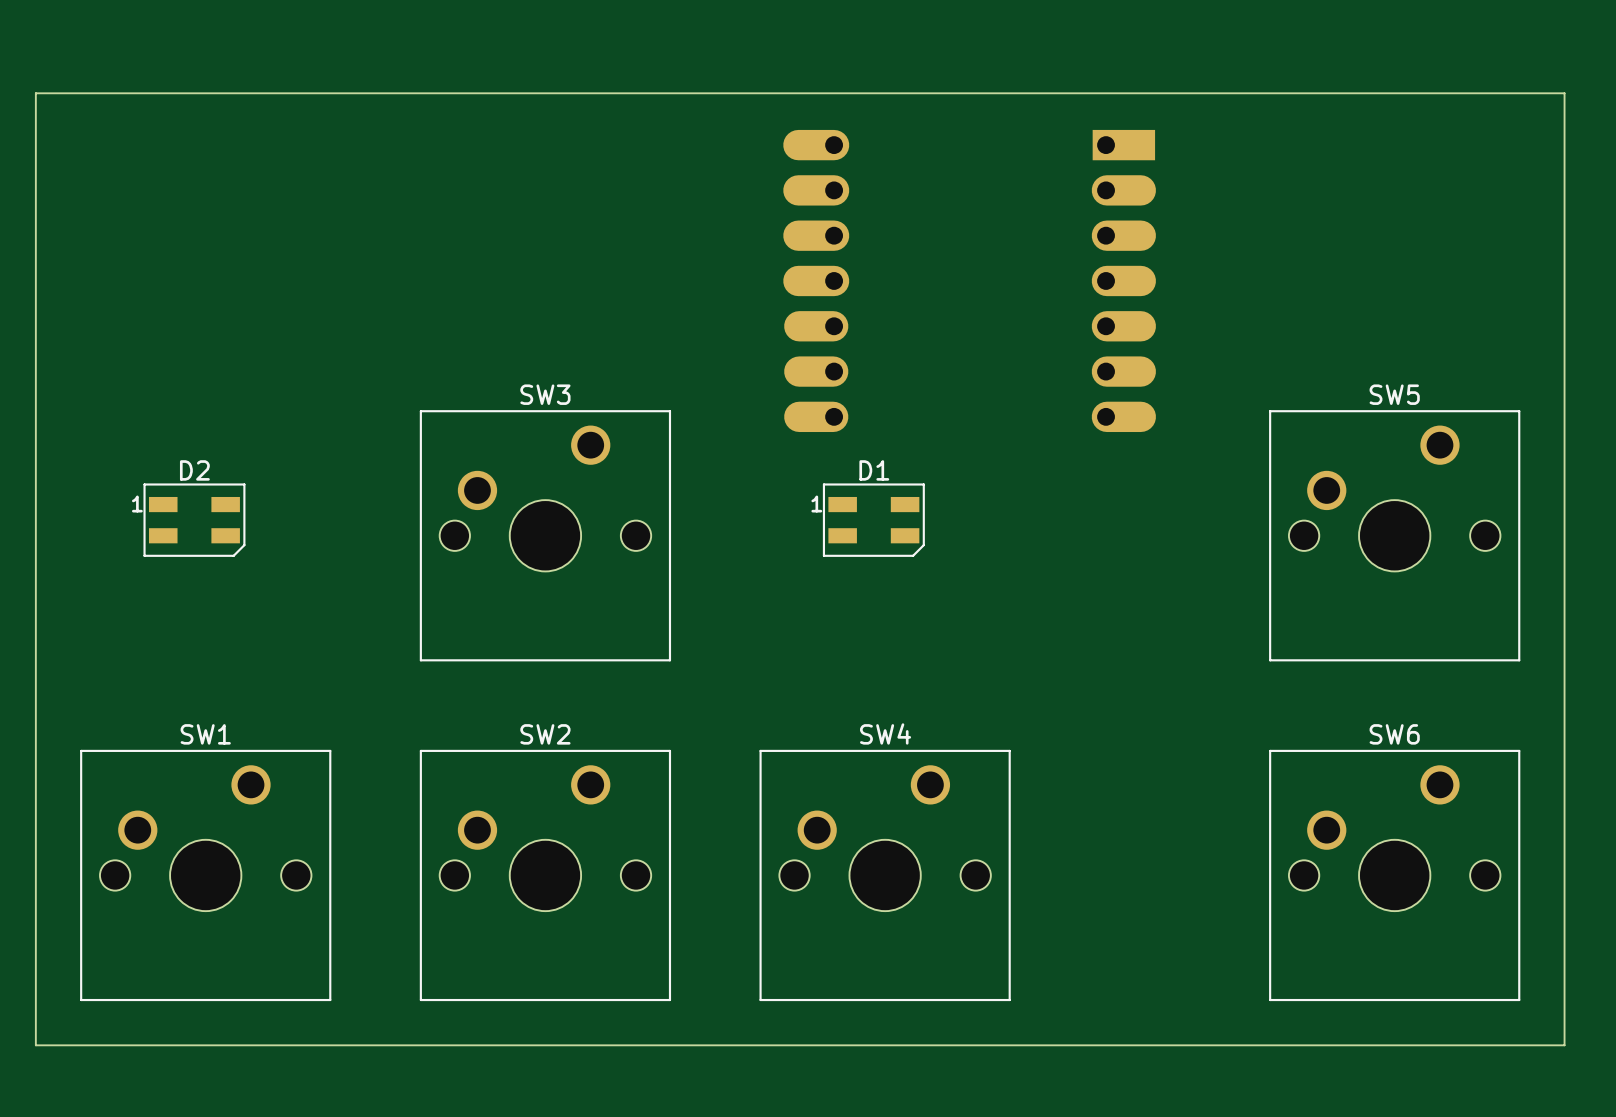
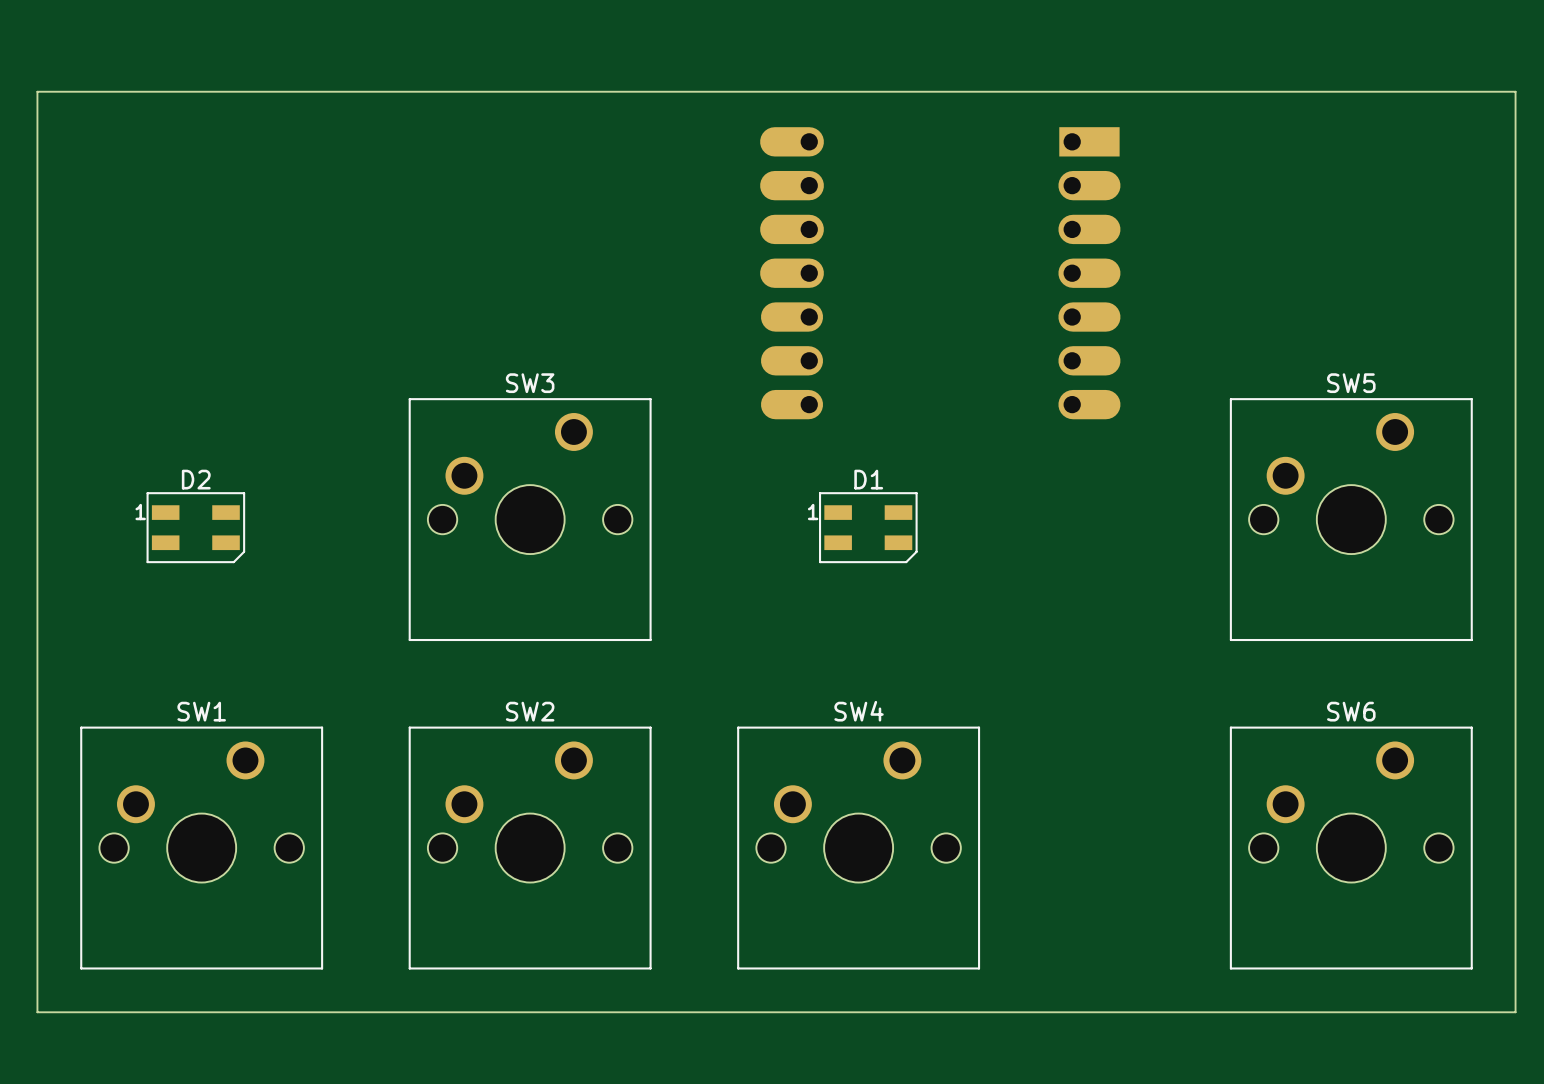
D2 position: (194, 520) -> (195, 527)
D1 position: (873, 520) -> (868, 527)

